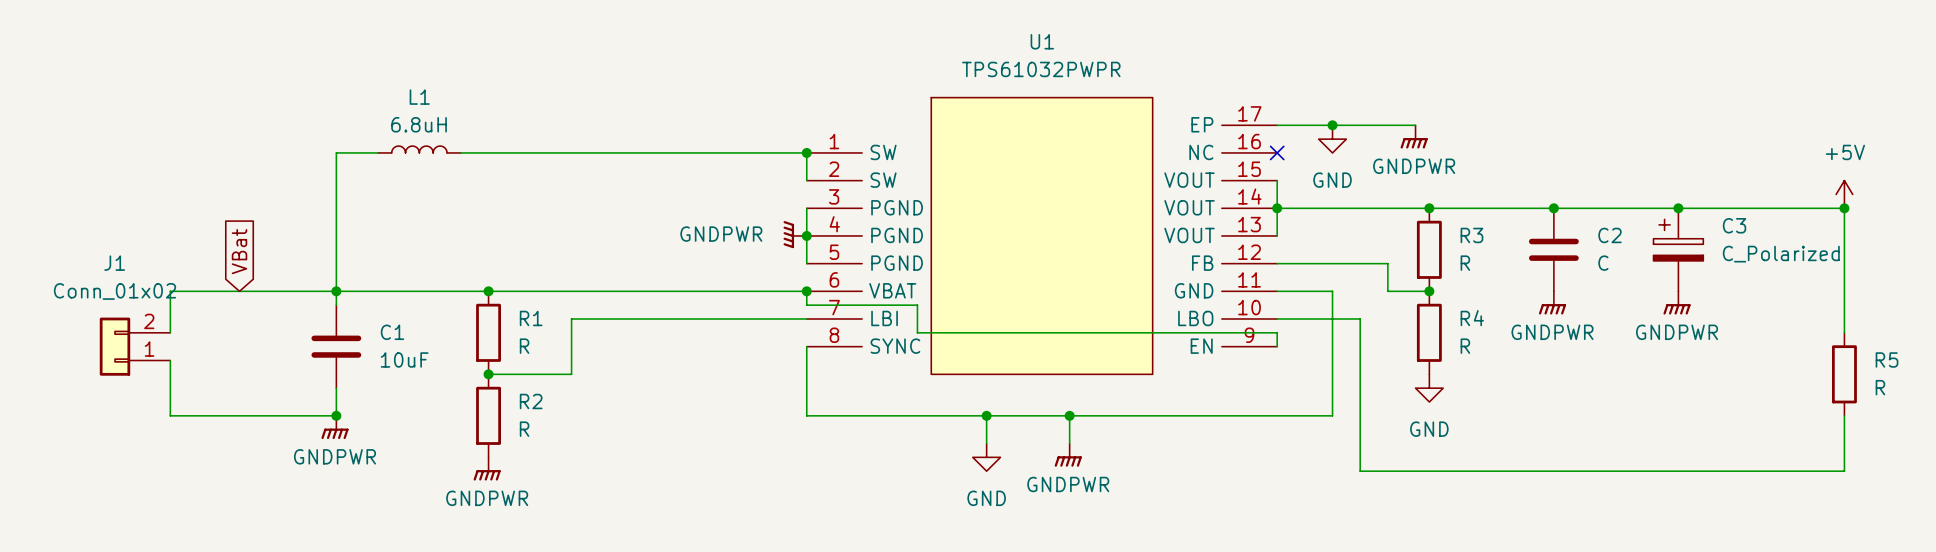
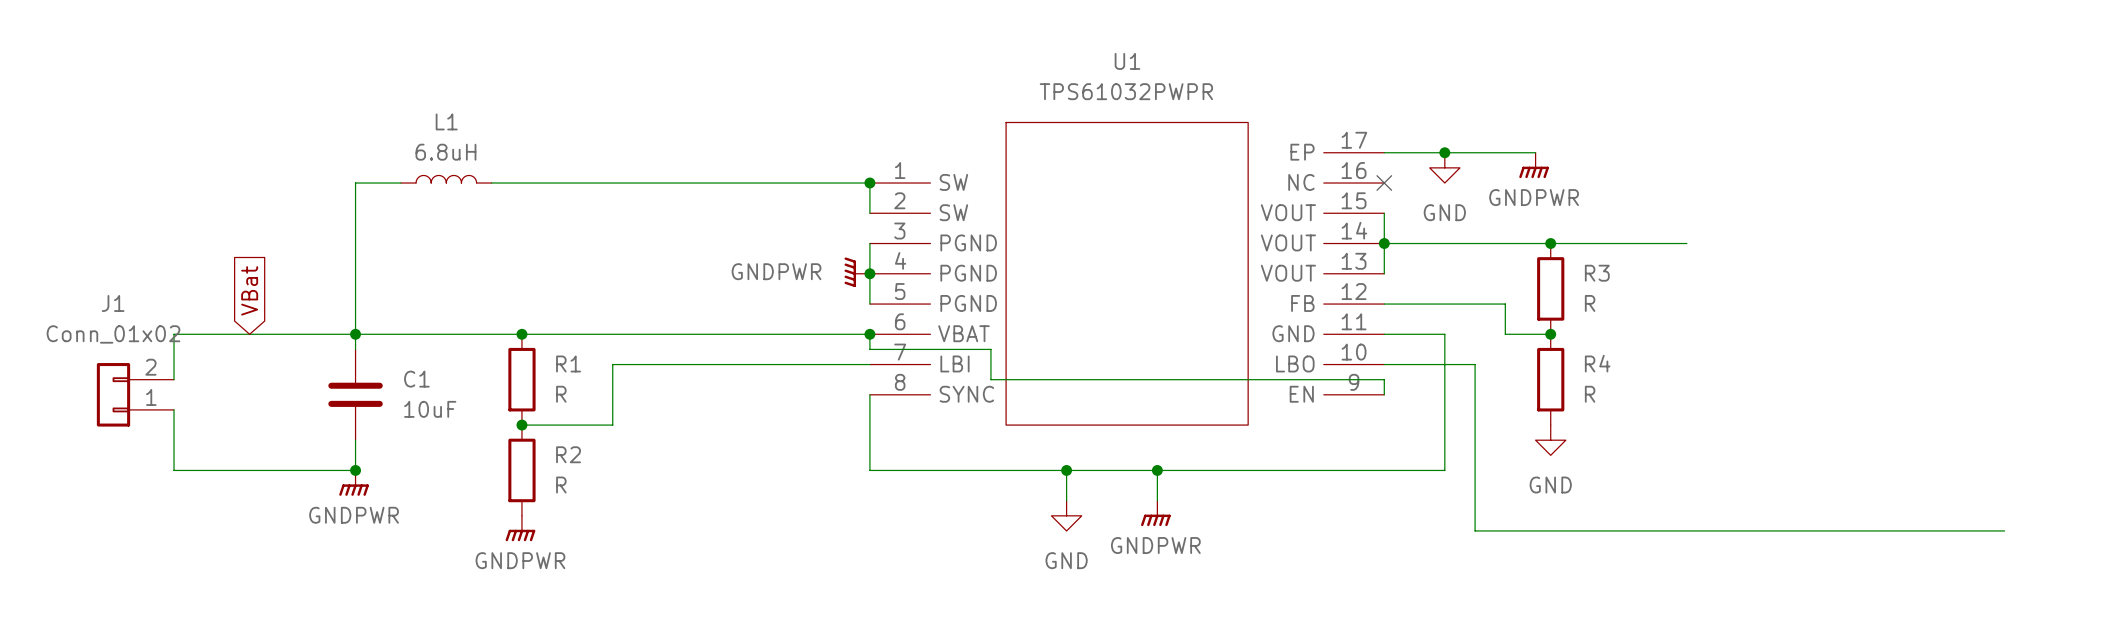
power symbol: +5V (1844, 194) -> none
wire: (1553, 208) (1844, 208) (1844, 332) -> none
junction: (1553, 208) -> none
junction: (1678, 208) -> none
junction: (1844, 208) -> none
C2: C (1553, 249) -> none
C3: C_Polarized (1678, 249) -> none
power symbol: GNDPWR (1552, 302) -> none
power symbol: GNDPWR (1677, 302) -> none
R5: R (1844, 374) -> none
wire: (1844, 415) (1844, 471) -> none

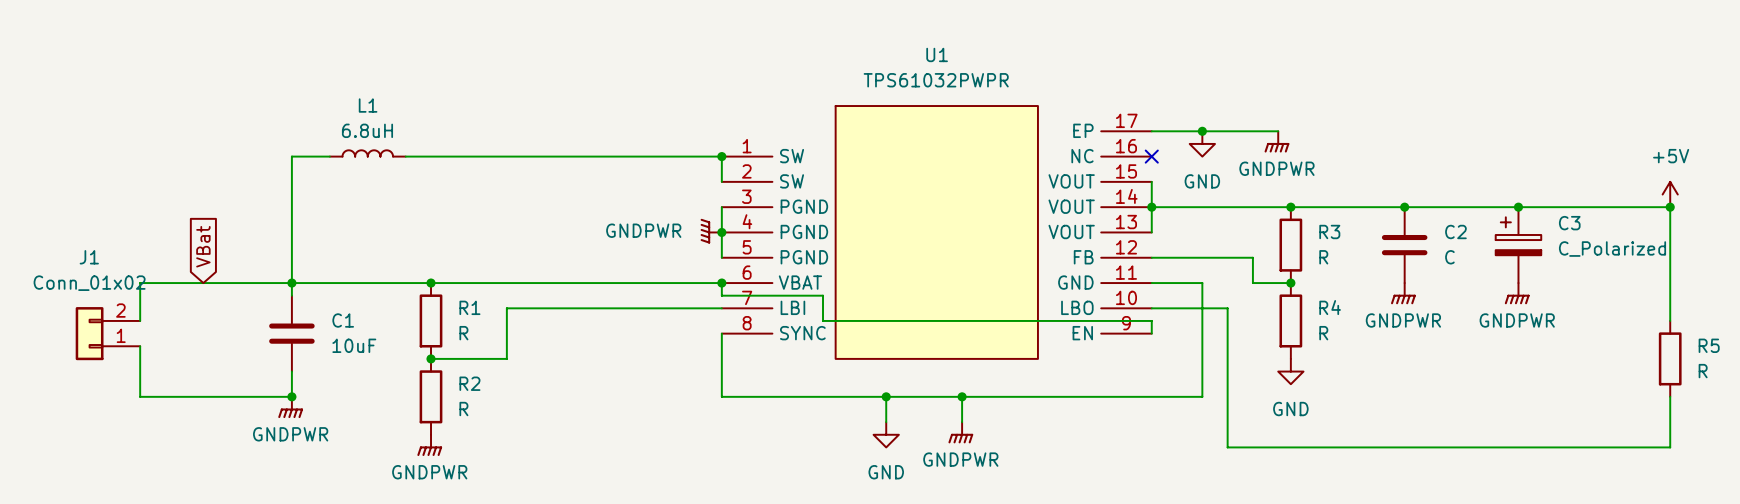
power symbol: none -> +5V (1670, 194)
wire: none -> (1404, 207) (1670, 207) (1670, 320)
junction: none -> (1404, 207)
junction: none -> (1518, 207)
junction: none -> (1670, 207)
C2: none -> C (1404, 245)
C3: none -> C_Polarized (1518, 245)
power symbol: none -> GNDPWR (1403, 293)
power symbol: none -> GNDPWR (1517, 293)
R5: none -> R (1670, 358)
wire: none -> (1670, 396) (1670, 447)

